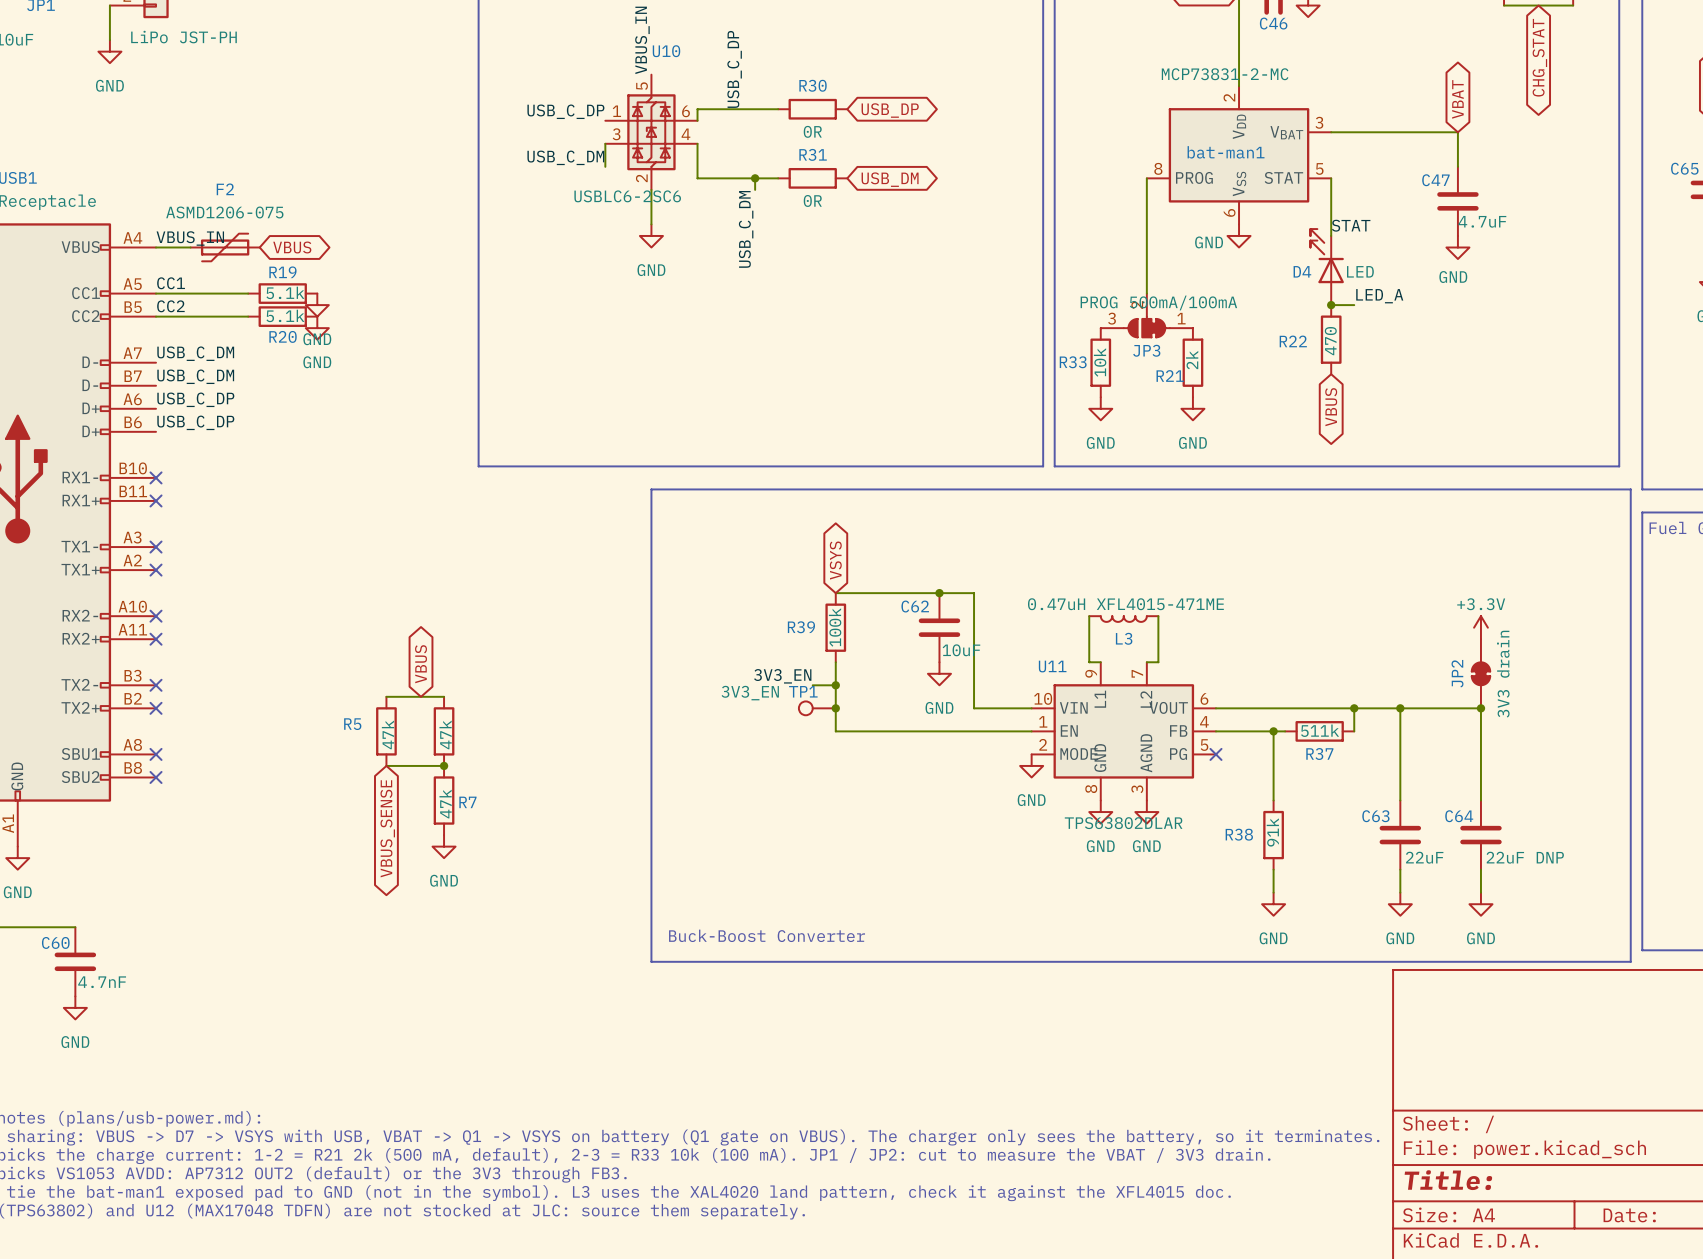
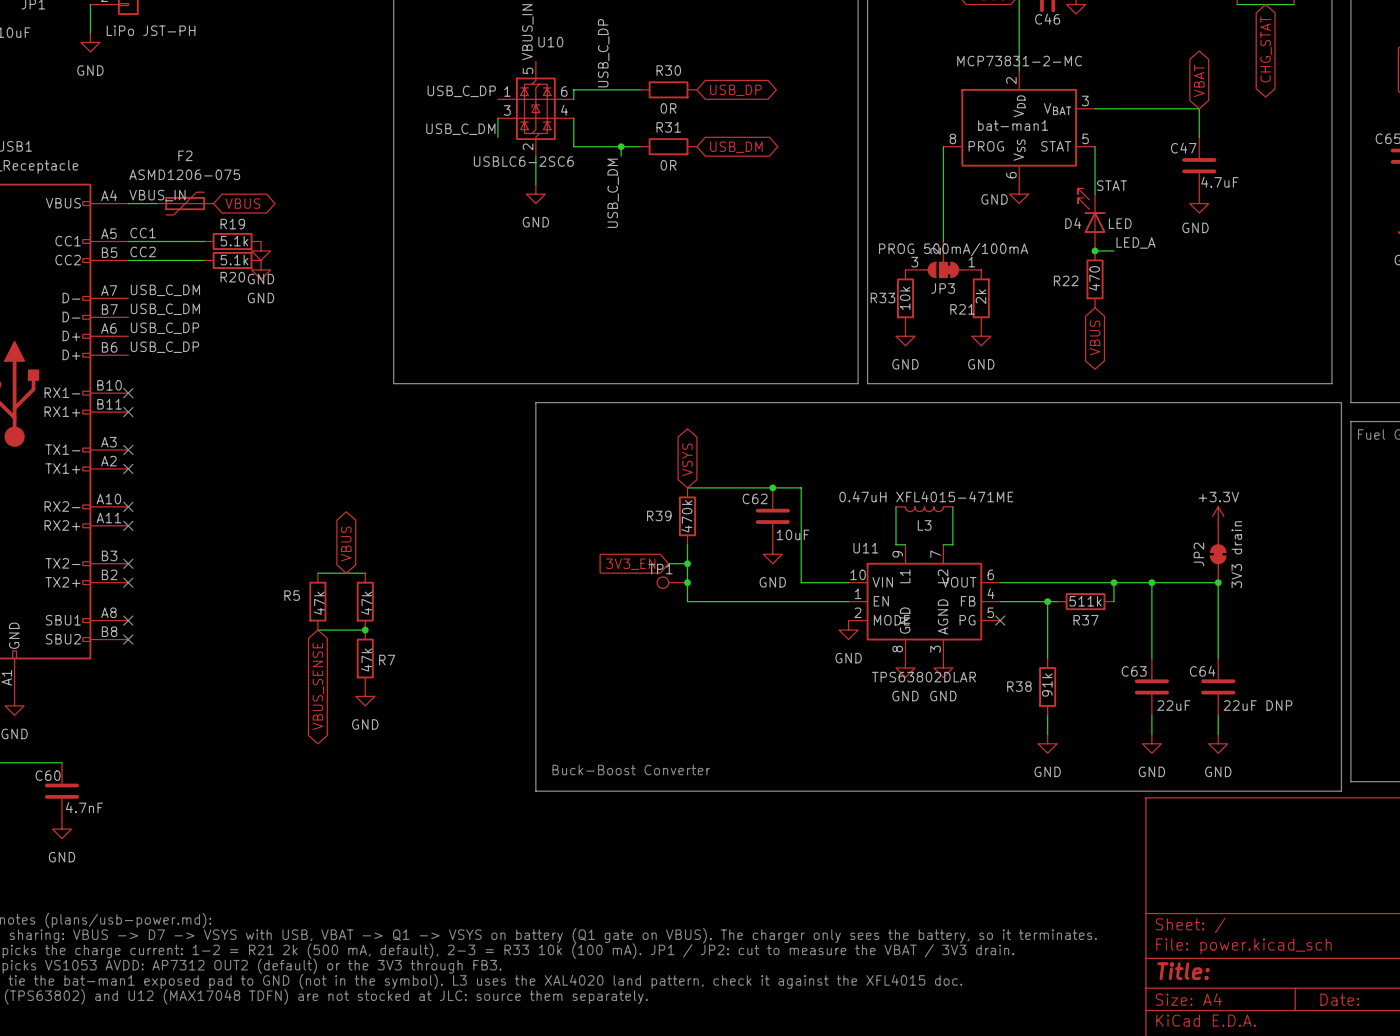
R39 value: 100k (835, 627) -> 470k (686, 516)
label: 3V3_EN (782, 676) -> none
global label: none -> 3V3_EN (630, 564)
TP1 value: 3V3_EN (750, 693) -> none

